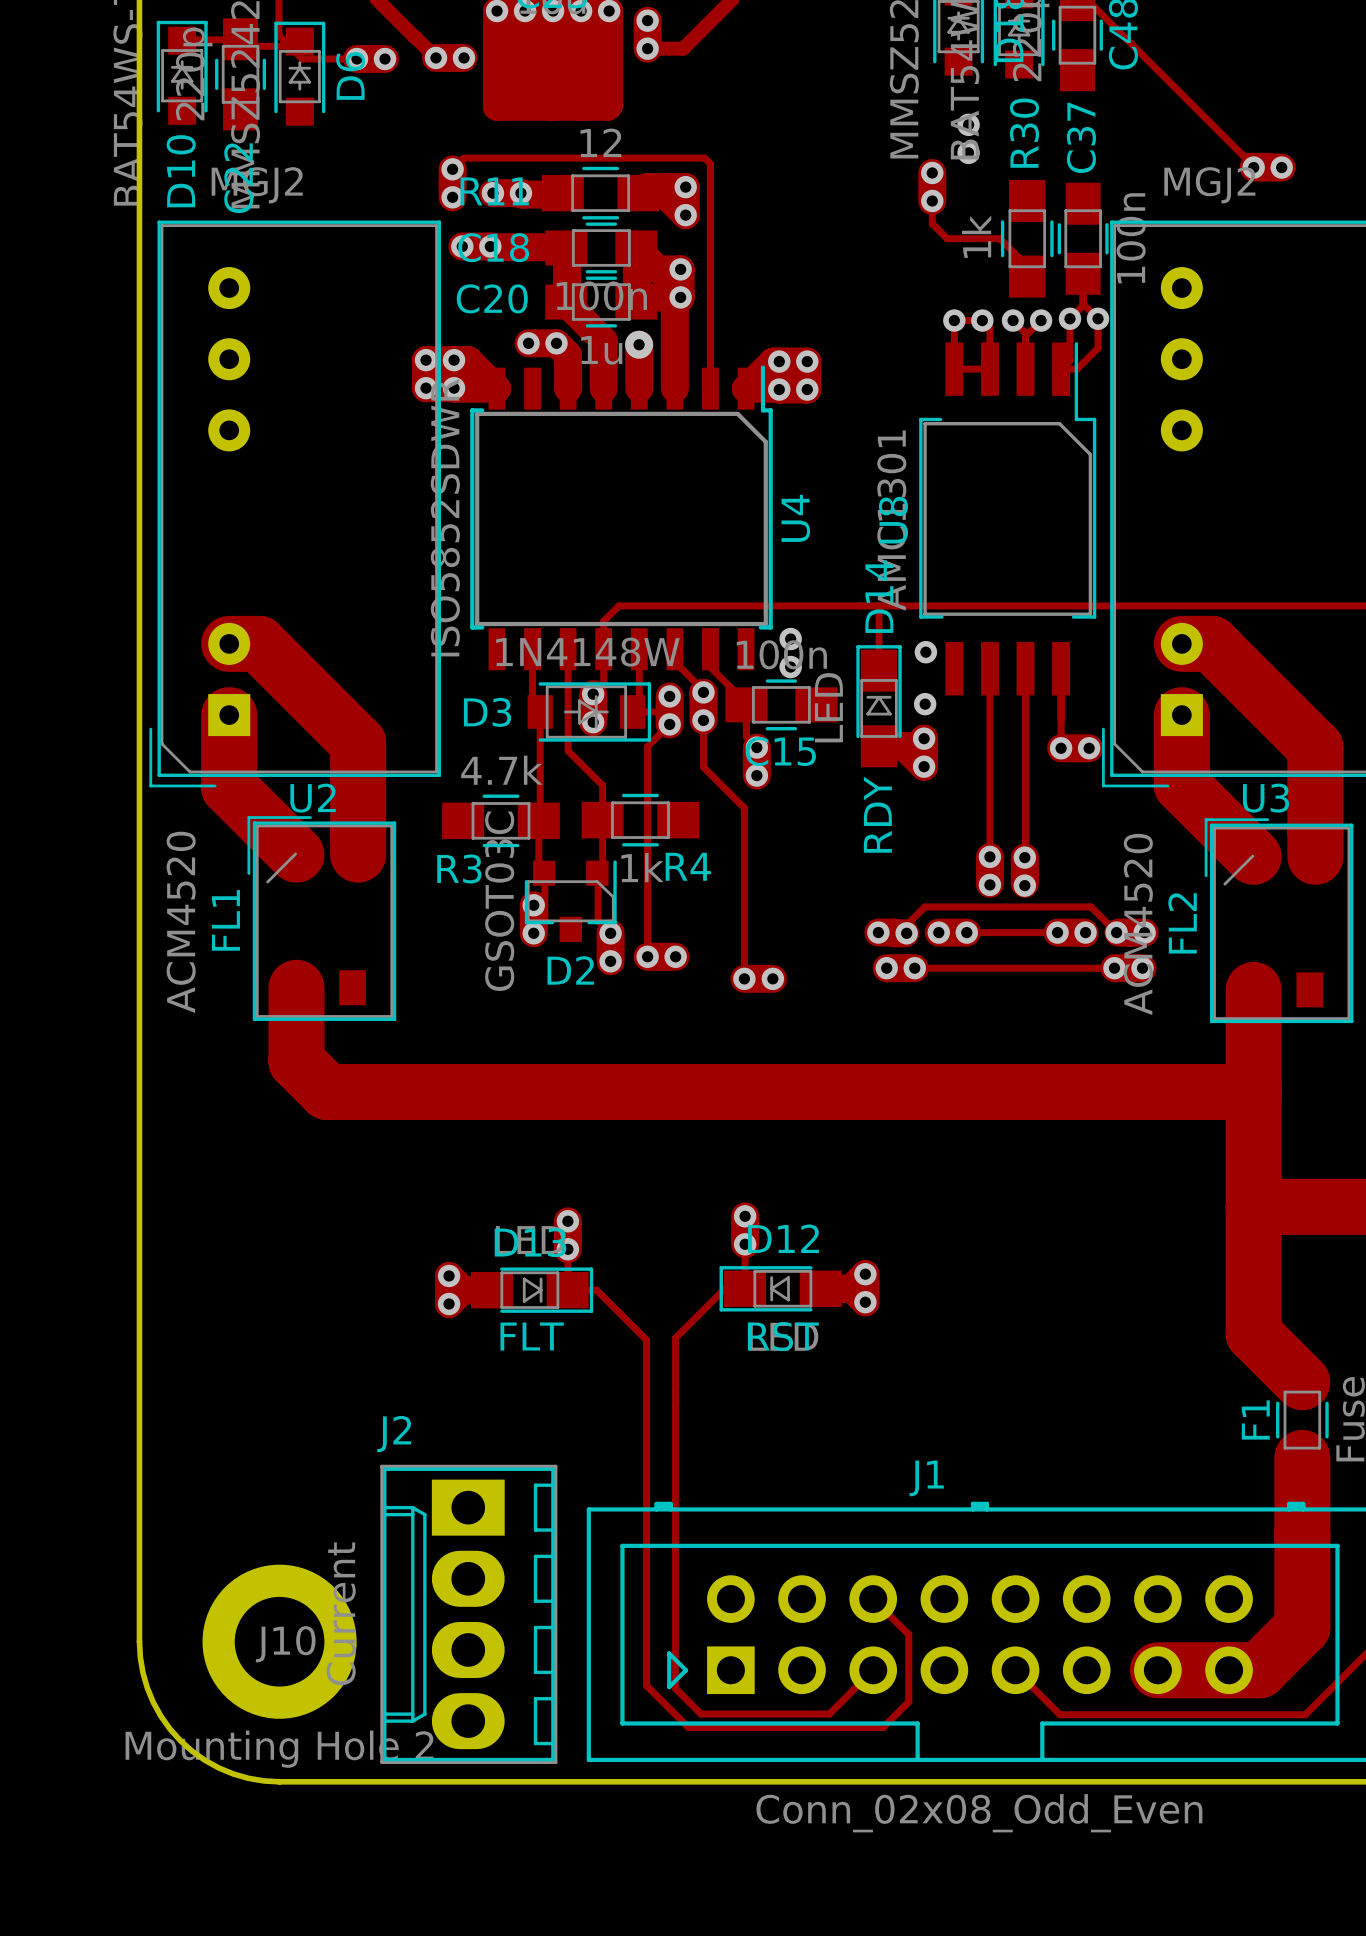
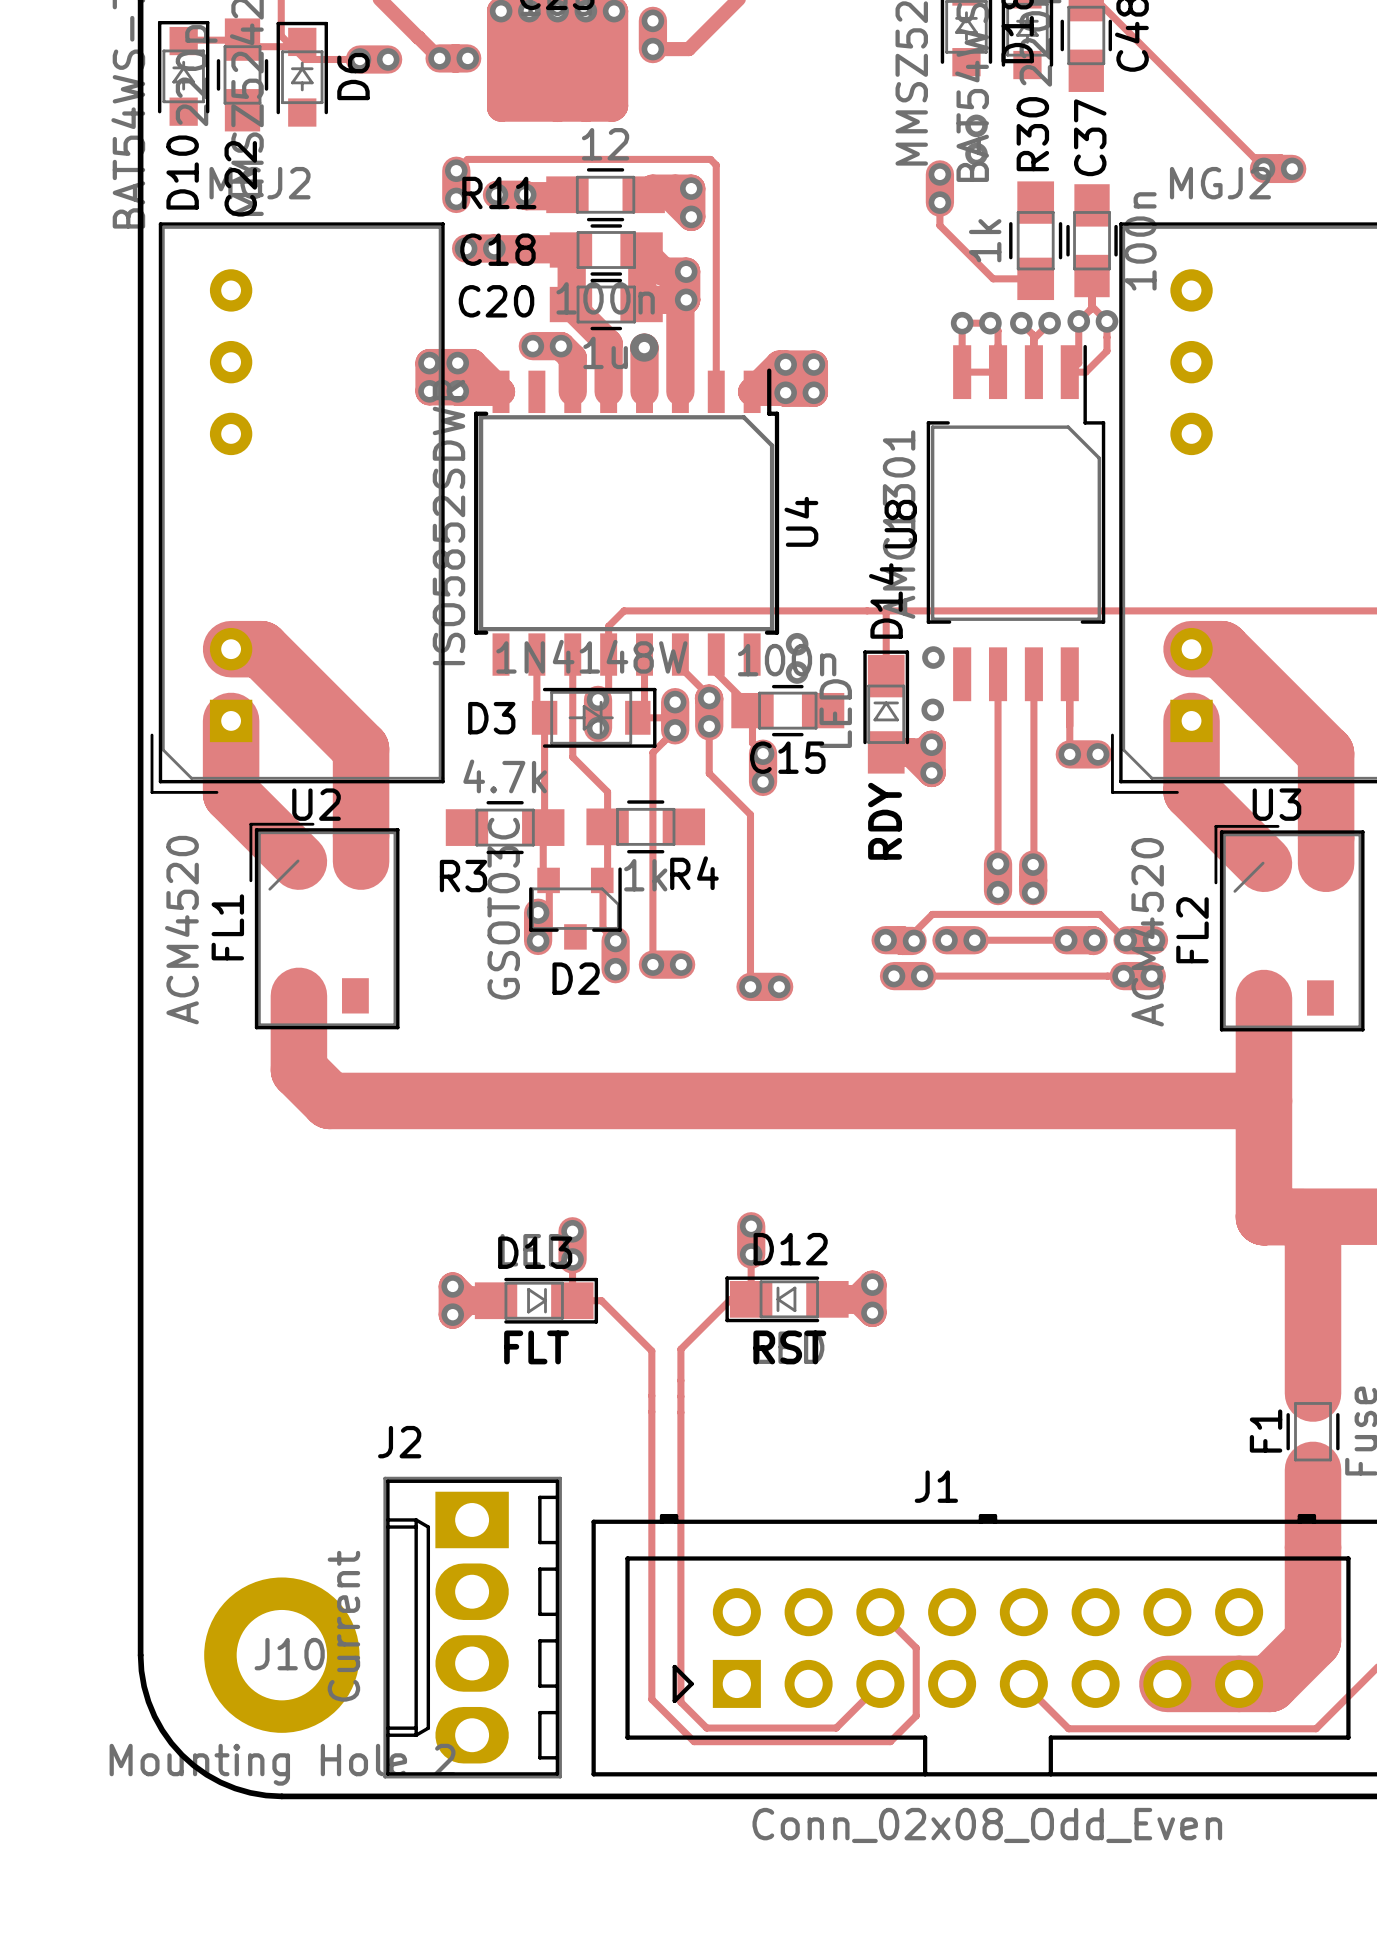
track: (947, 238) (999, 238) (1027, 266) (1027, 276) -> (954, 240) (993, 278) (1035, 278)
track: (1253, 1207) (1253, 1333) (1302, 1382) -> (1263, 1217) (1303, 1217) (1313, 1226) (1313, 1393)

